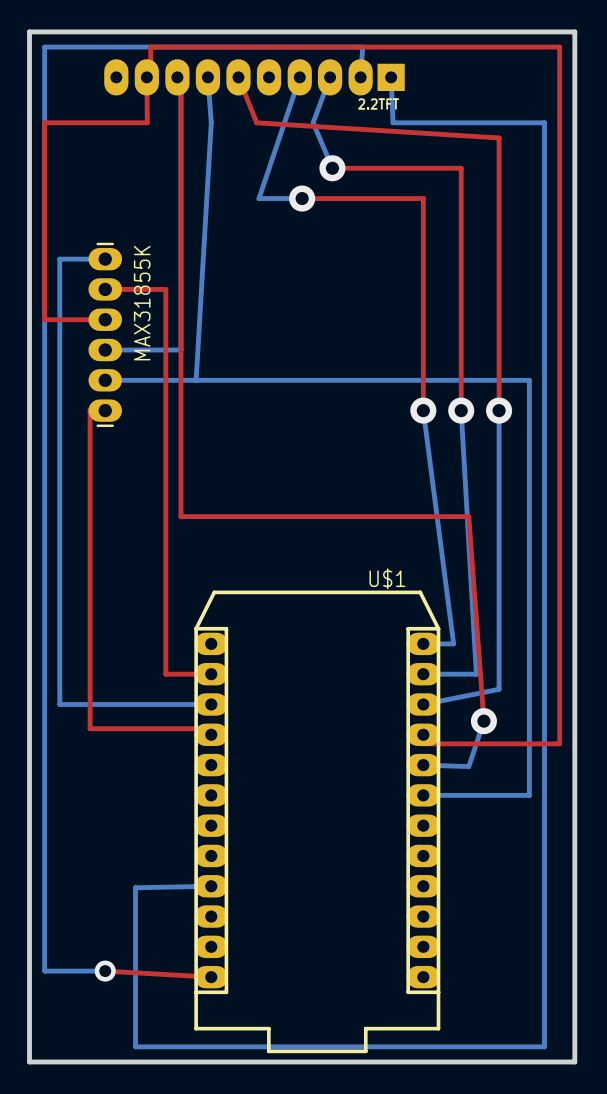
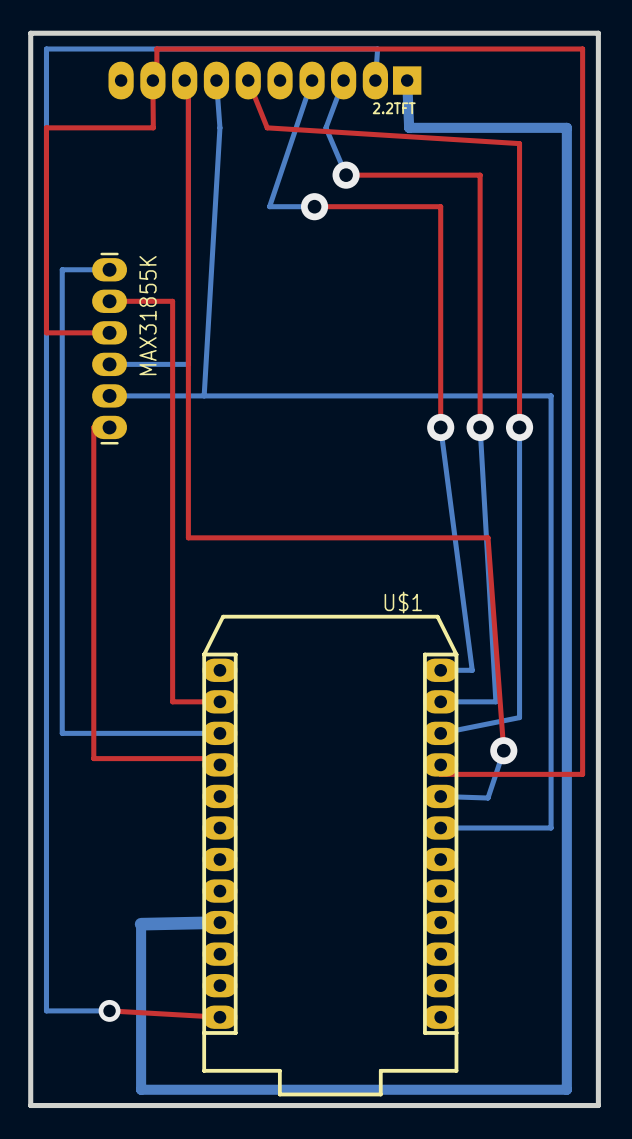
bottom track width: thin (391, 77) (393, 122) (544, 122) (544, 1046) (135, 1046) (135, 887) (211, 886) -> thick (407, 80) (409, 127) (566, 127) (566, 1089) (141, 1089) (141, 924) (219, 922)

